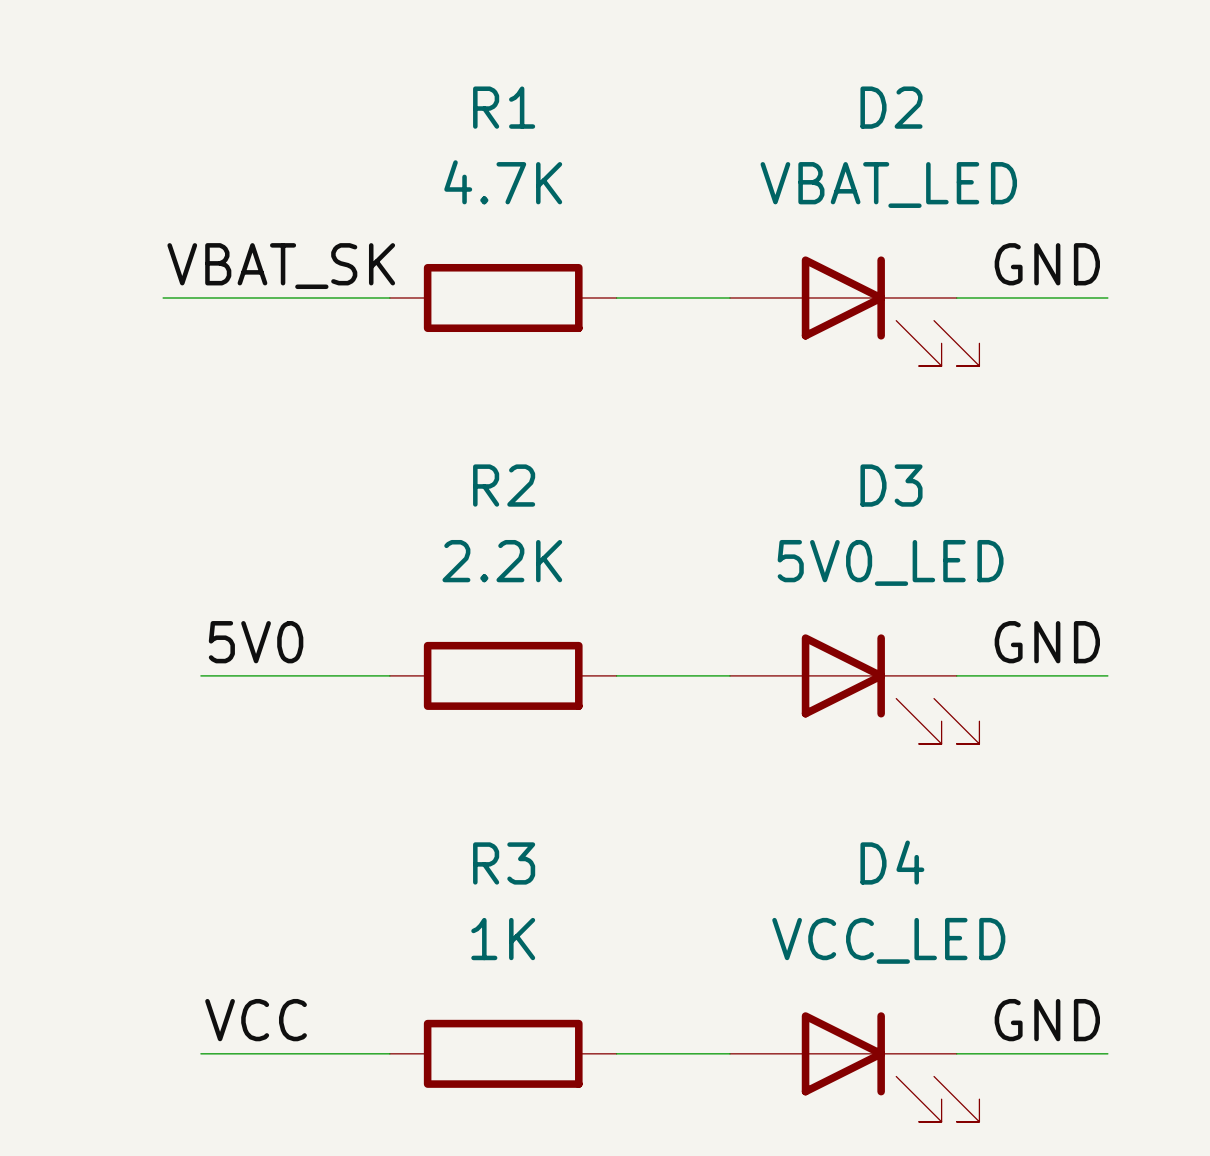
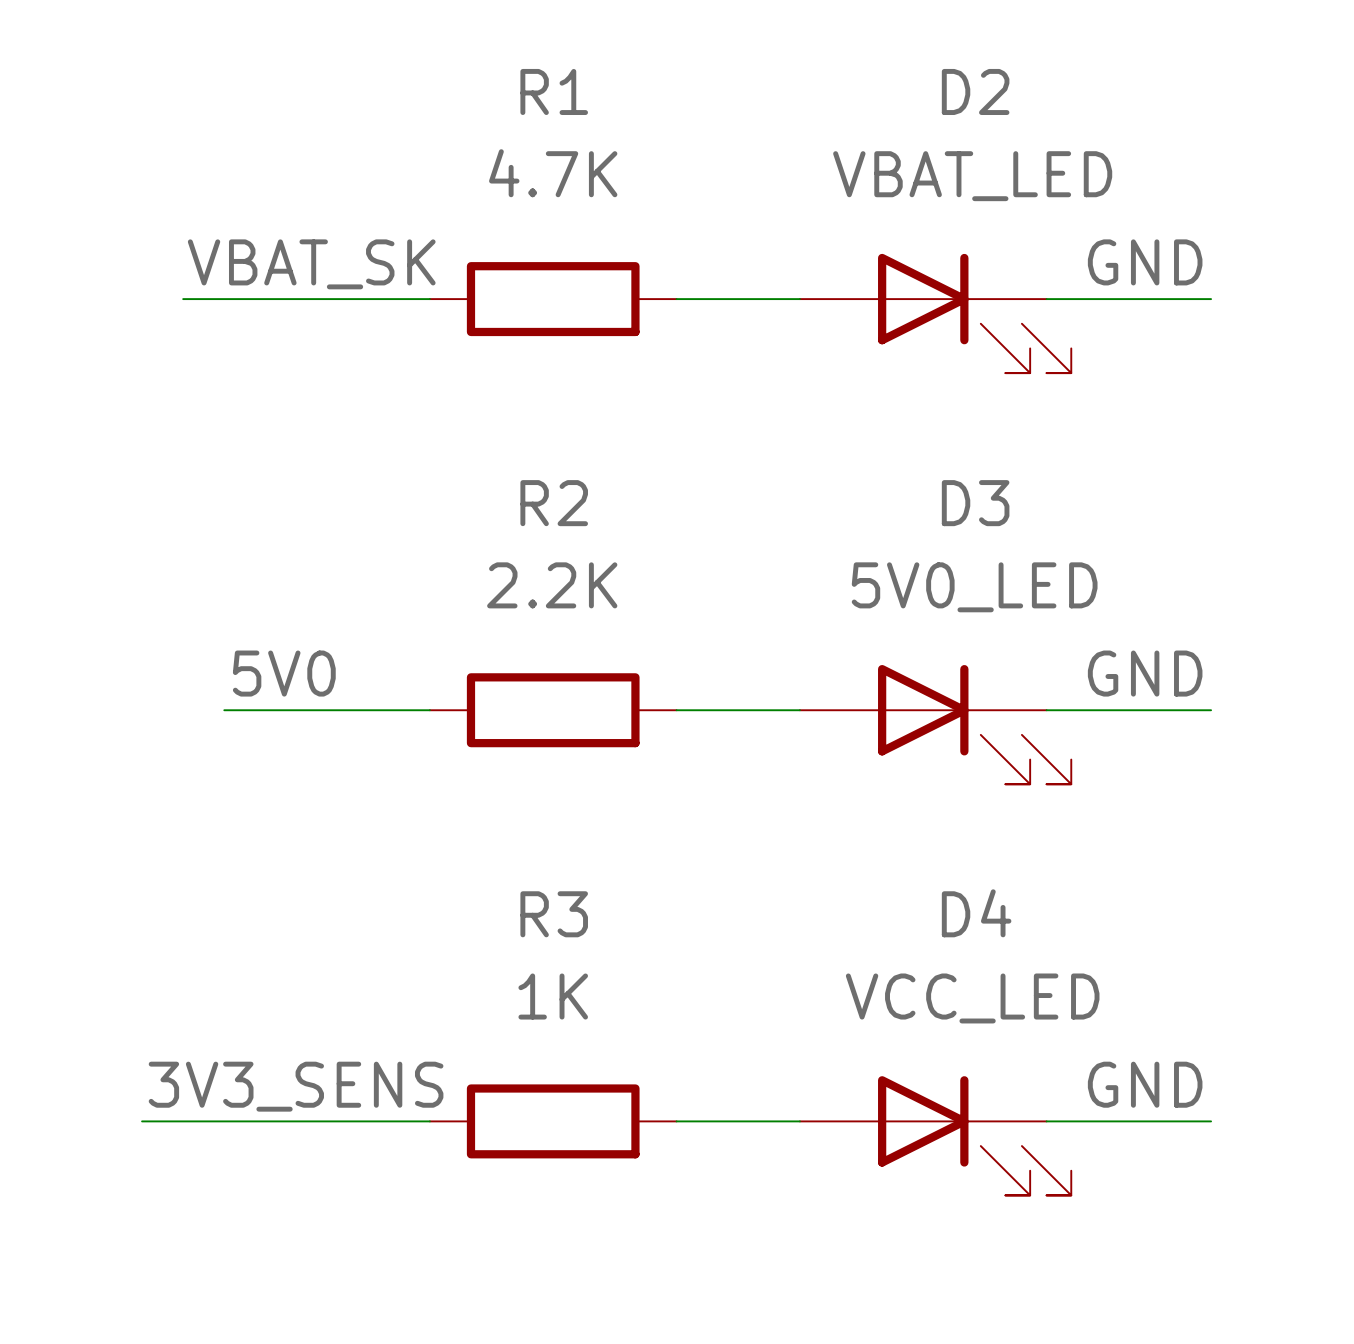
label: VCC (256, 1020) -> none
label: none -> 3V3_SENS (296, 1086)
wire: none -> (142, 1121) (224, 1121)

